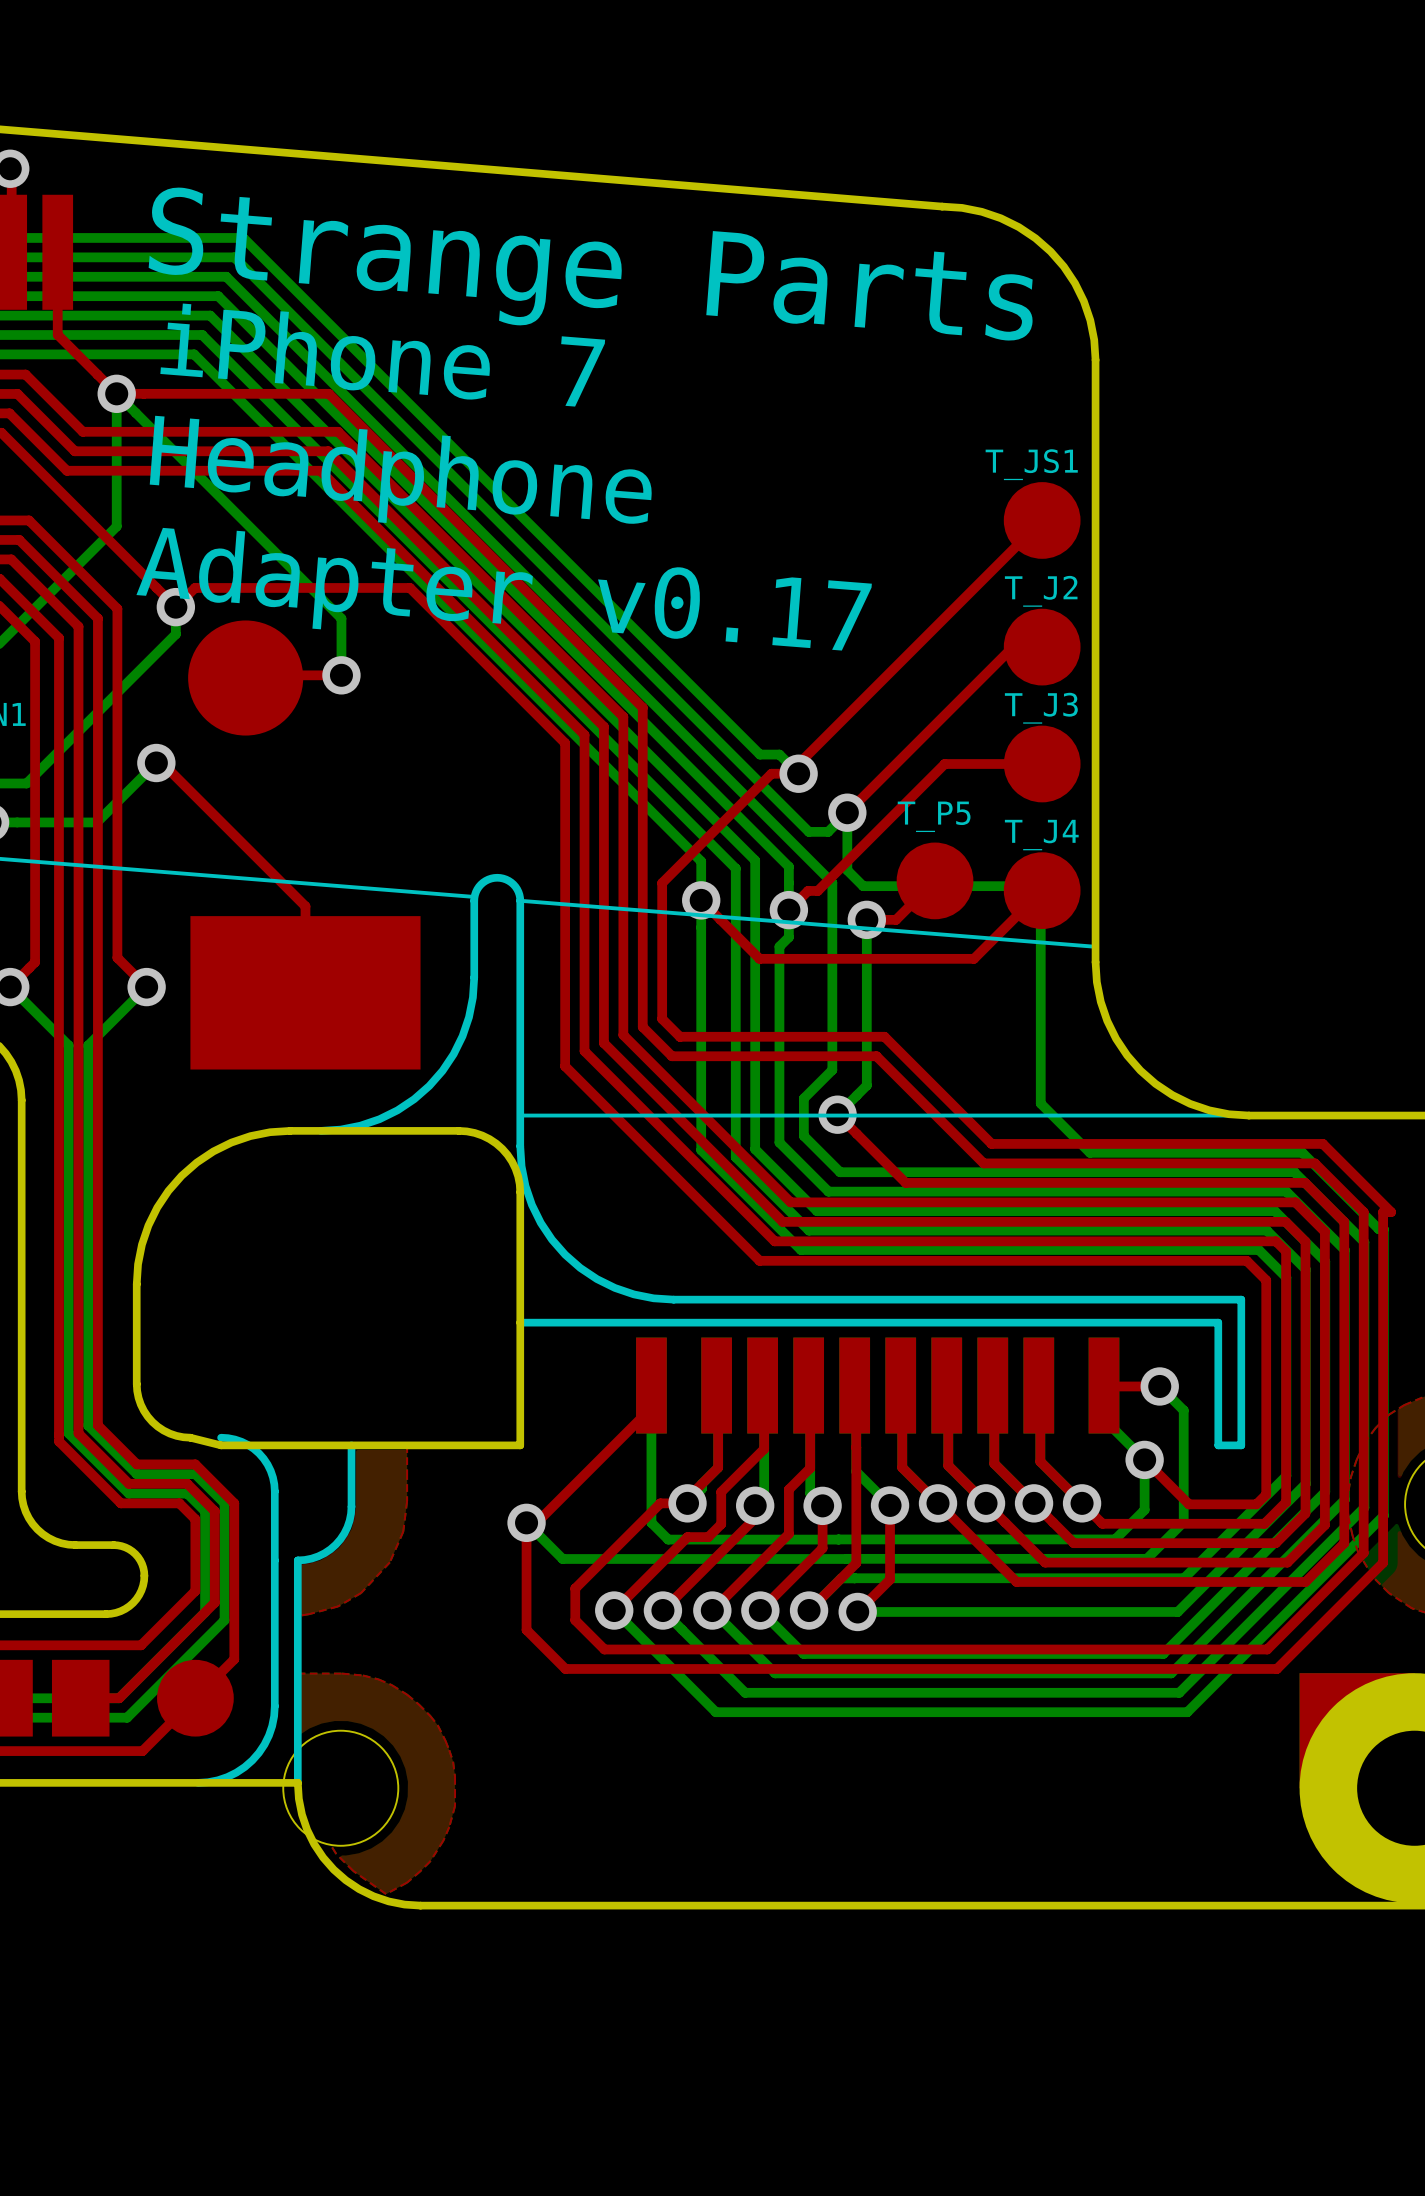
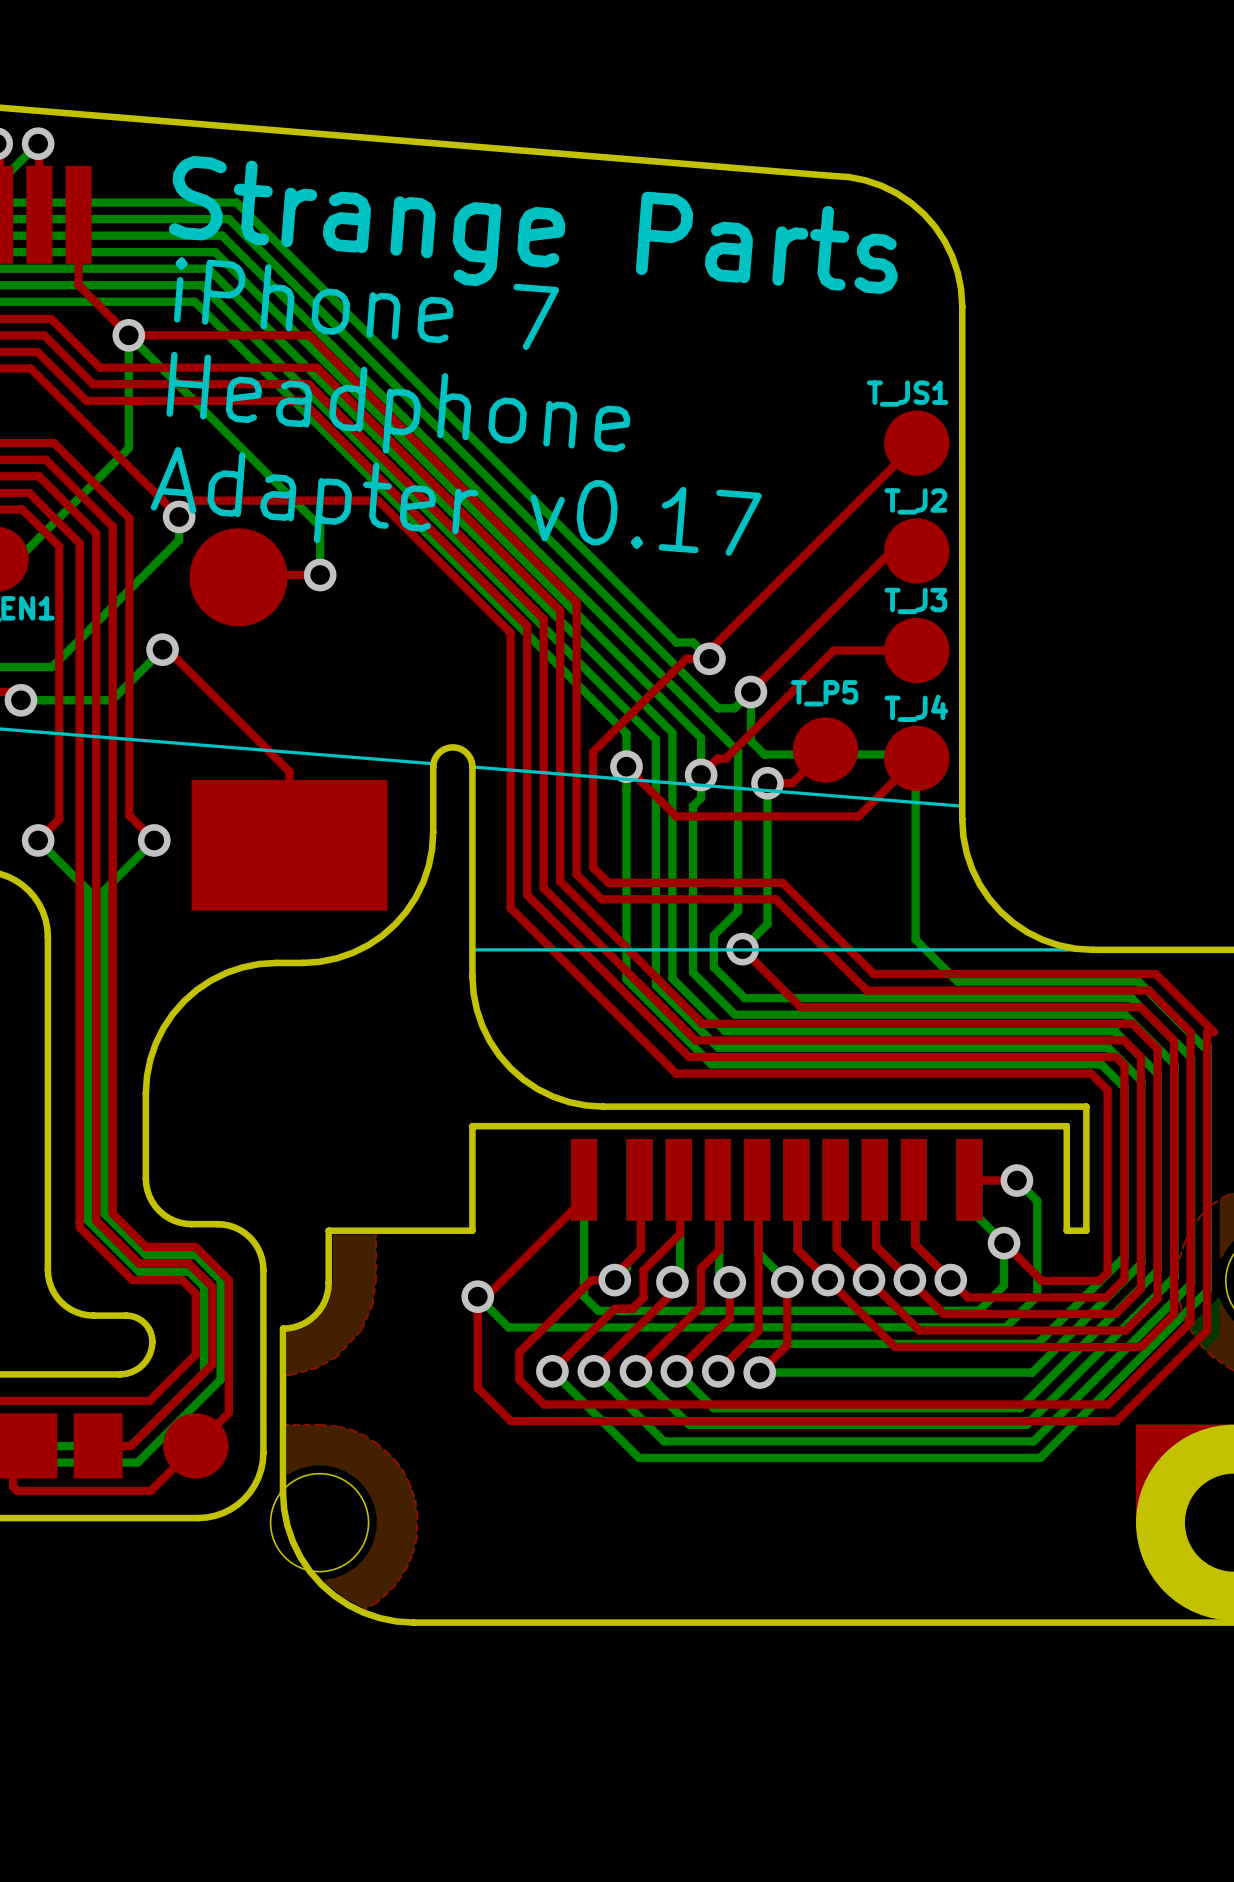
board edge: (320, 1130) (466, 1131) (482, 1135) (502, 1148) (515, 1168) (519, 1184) (520, 1322) -> (302, 962) (336, 958) (367, 945) (394, 924) (406, 911) (423, 882) (432, 849) (433, 761) (443, 750) (450, 747) (460, 748) (468, 755) (472, 766) (473, 993) (482, 1025) (489, 1041) (510, 1068) (523, 1079) (537, 1089) (569, 1102) (603, 1106) (1086, 1106) (1086, 1230) (1066, 1230) (1066, 1126) (472, 1126)
line: (320, 1130) (360, 1125) (397, 1110) (429, 1085) (442, 1070) (462, 1036) (472, 997) (475, 894) (478, 886) (485, 880) (494, 877) (506, 879) (515, 886) (520, 900) (521, 1166) (531, 1204) (540, 1222) (565, 1254) (580, 1267) (596, 1279) (633, 1294) (673, 1299) (1241, 1299) (1241, 1445) (1218, 1445) (1218, 1322) (520, 1322) -> none
board edge: (190, 1437) (221, 1445) (351, 1445) -> (191, 1224) (223, 1224) (240, 1230) (250, 1237) (257, 1247) (261, 1258) (263, 1269) (263, 1452) (261, 1469) (249, 1492) (237, 1504) (223, 1513) (198, 1518)
line: (221, 1437) (241, 1441) (253, 1448) (267, 1464) (274, 1484) (274, 1716) (264, 1744) (252, 1760) (227, 1777) (198, 1782) -> none
line: (351, 1445) (351, 1506) (347, 1527) (340, 1539) (324, 1553) (311, 1558) (297, 1560) (297, 1782) -> none
board edge: (198, 1782) (297, 1782) (302, 1814) (307, 1829) (323, 1857) (345, 1880) (373, 1896) (388, 1901) (404, 1904) (451, 1905) -> (328, 1230) (328, 1282) (325, 1300) (319, 1310) (305, 1322) (294, 1327) (283, 1328) (283, 1491) (287, 1525) (292, 1541) (309, 1571) (334, 1595) (348, 1605) (379, 1618) (413, 1622)

